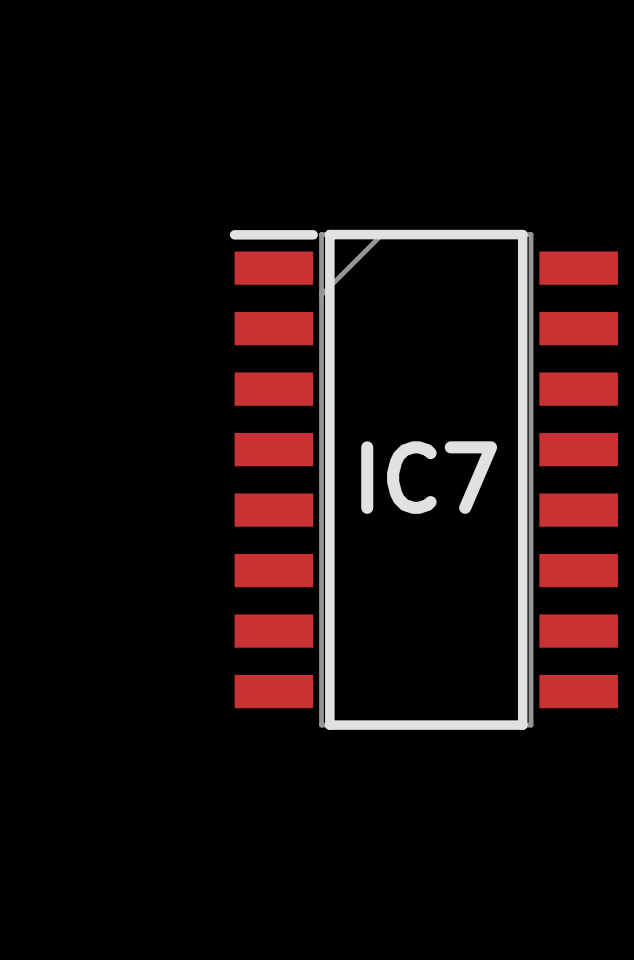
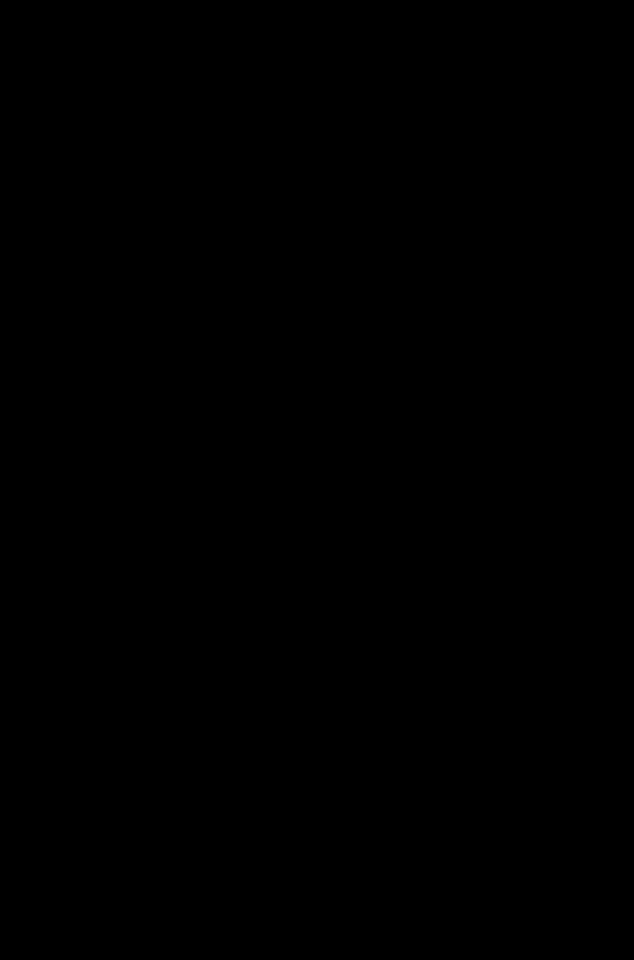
IC7: (423, 479) -> none

